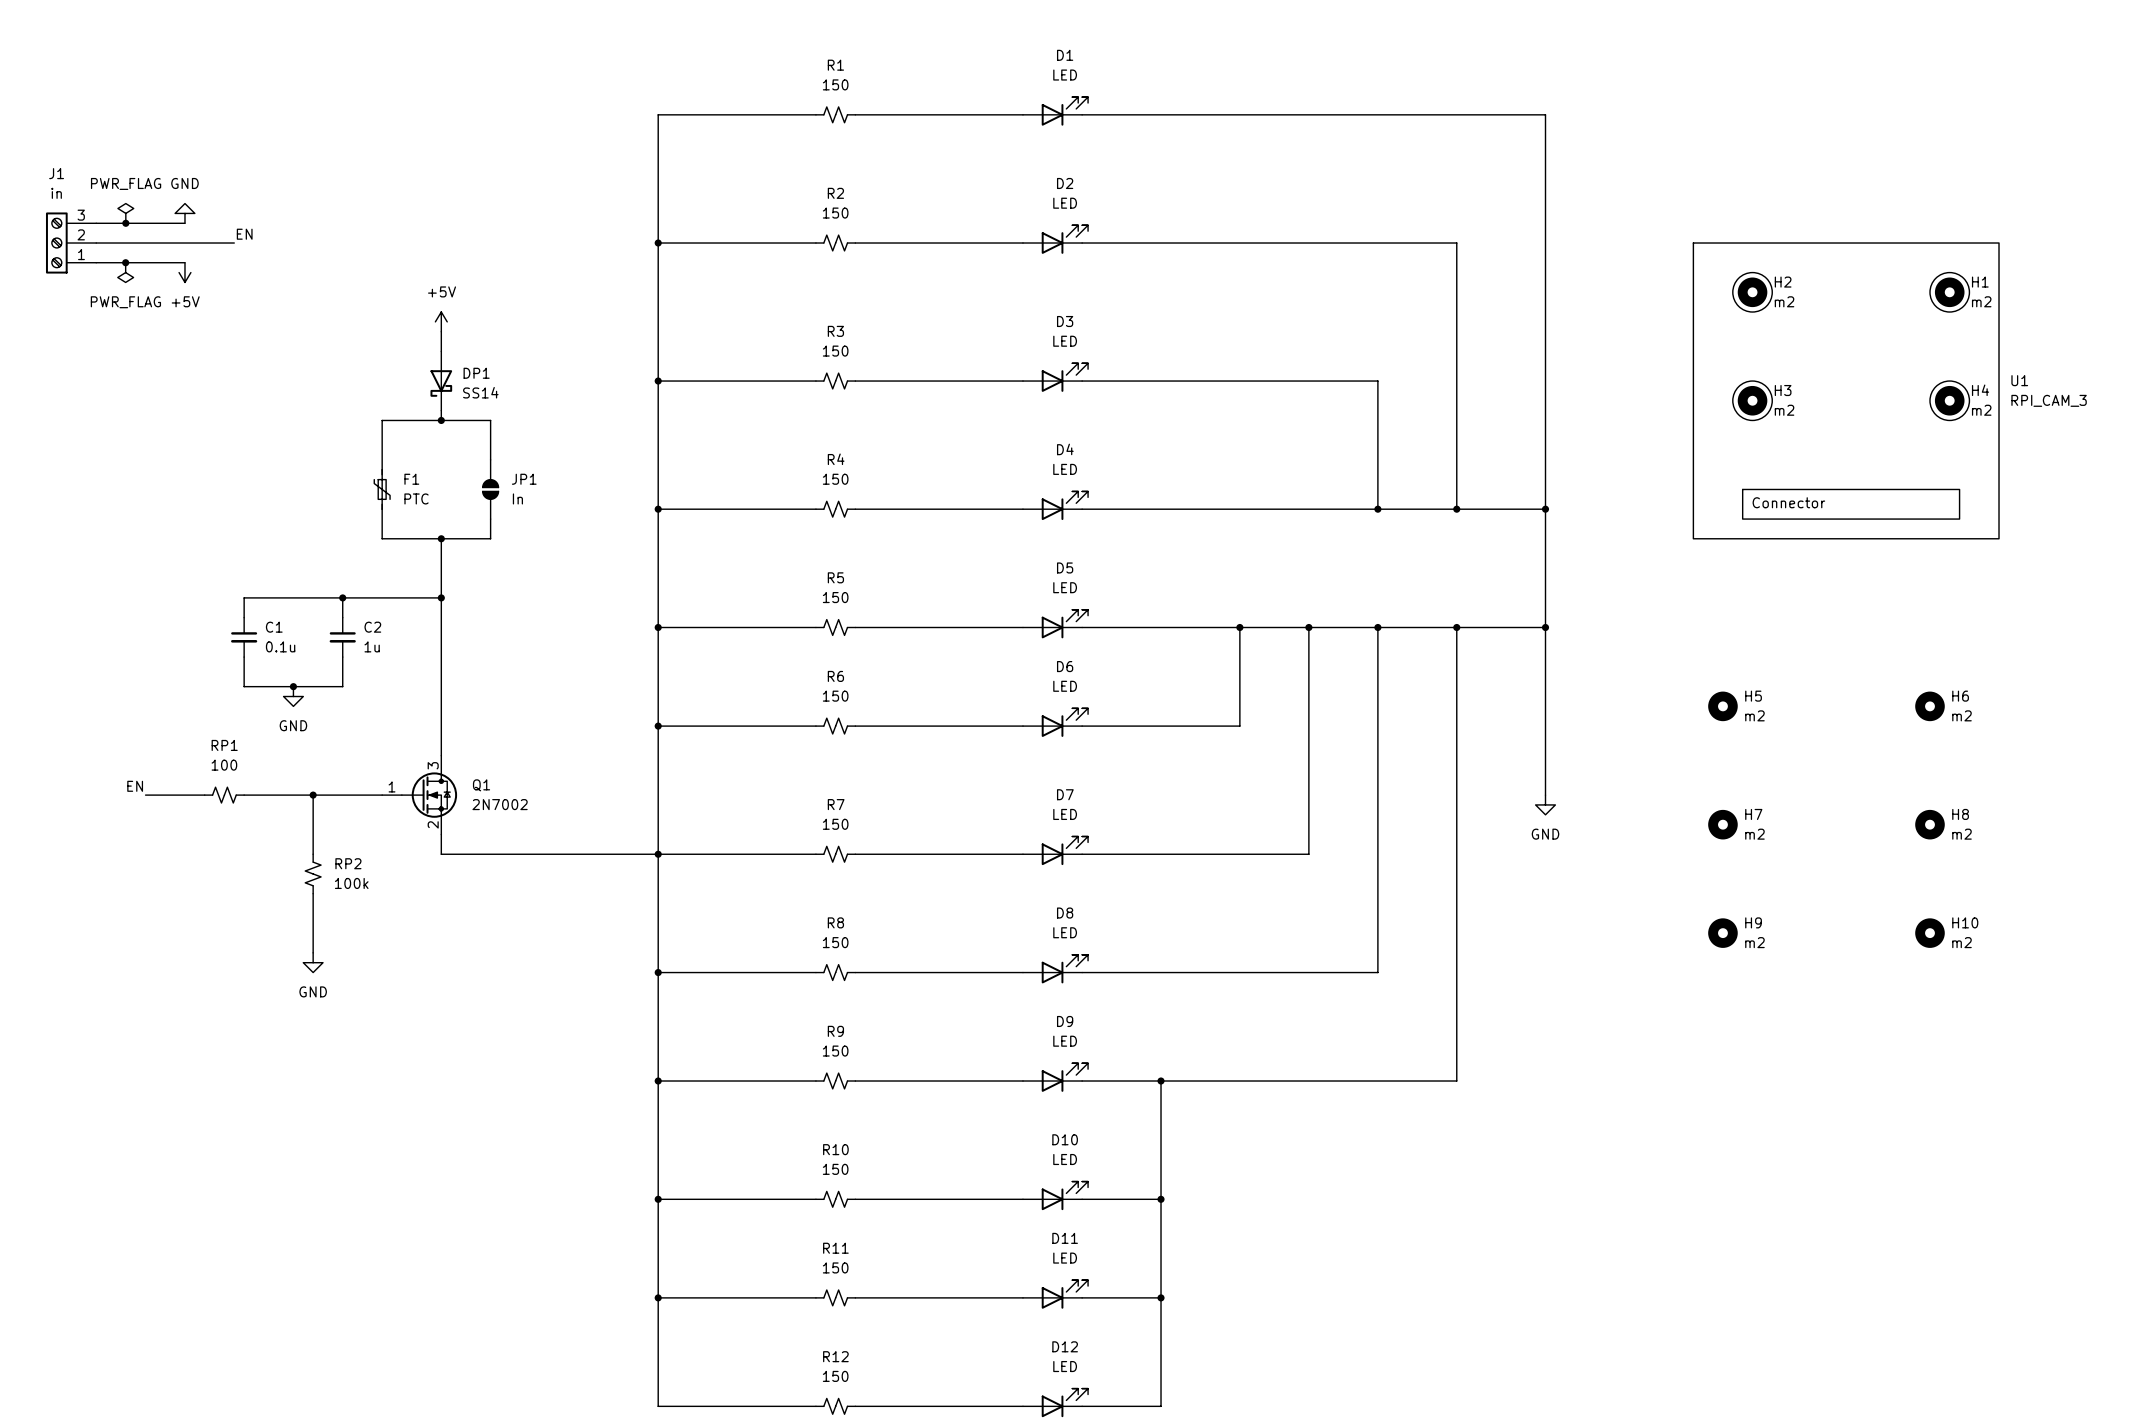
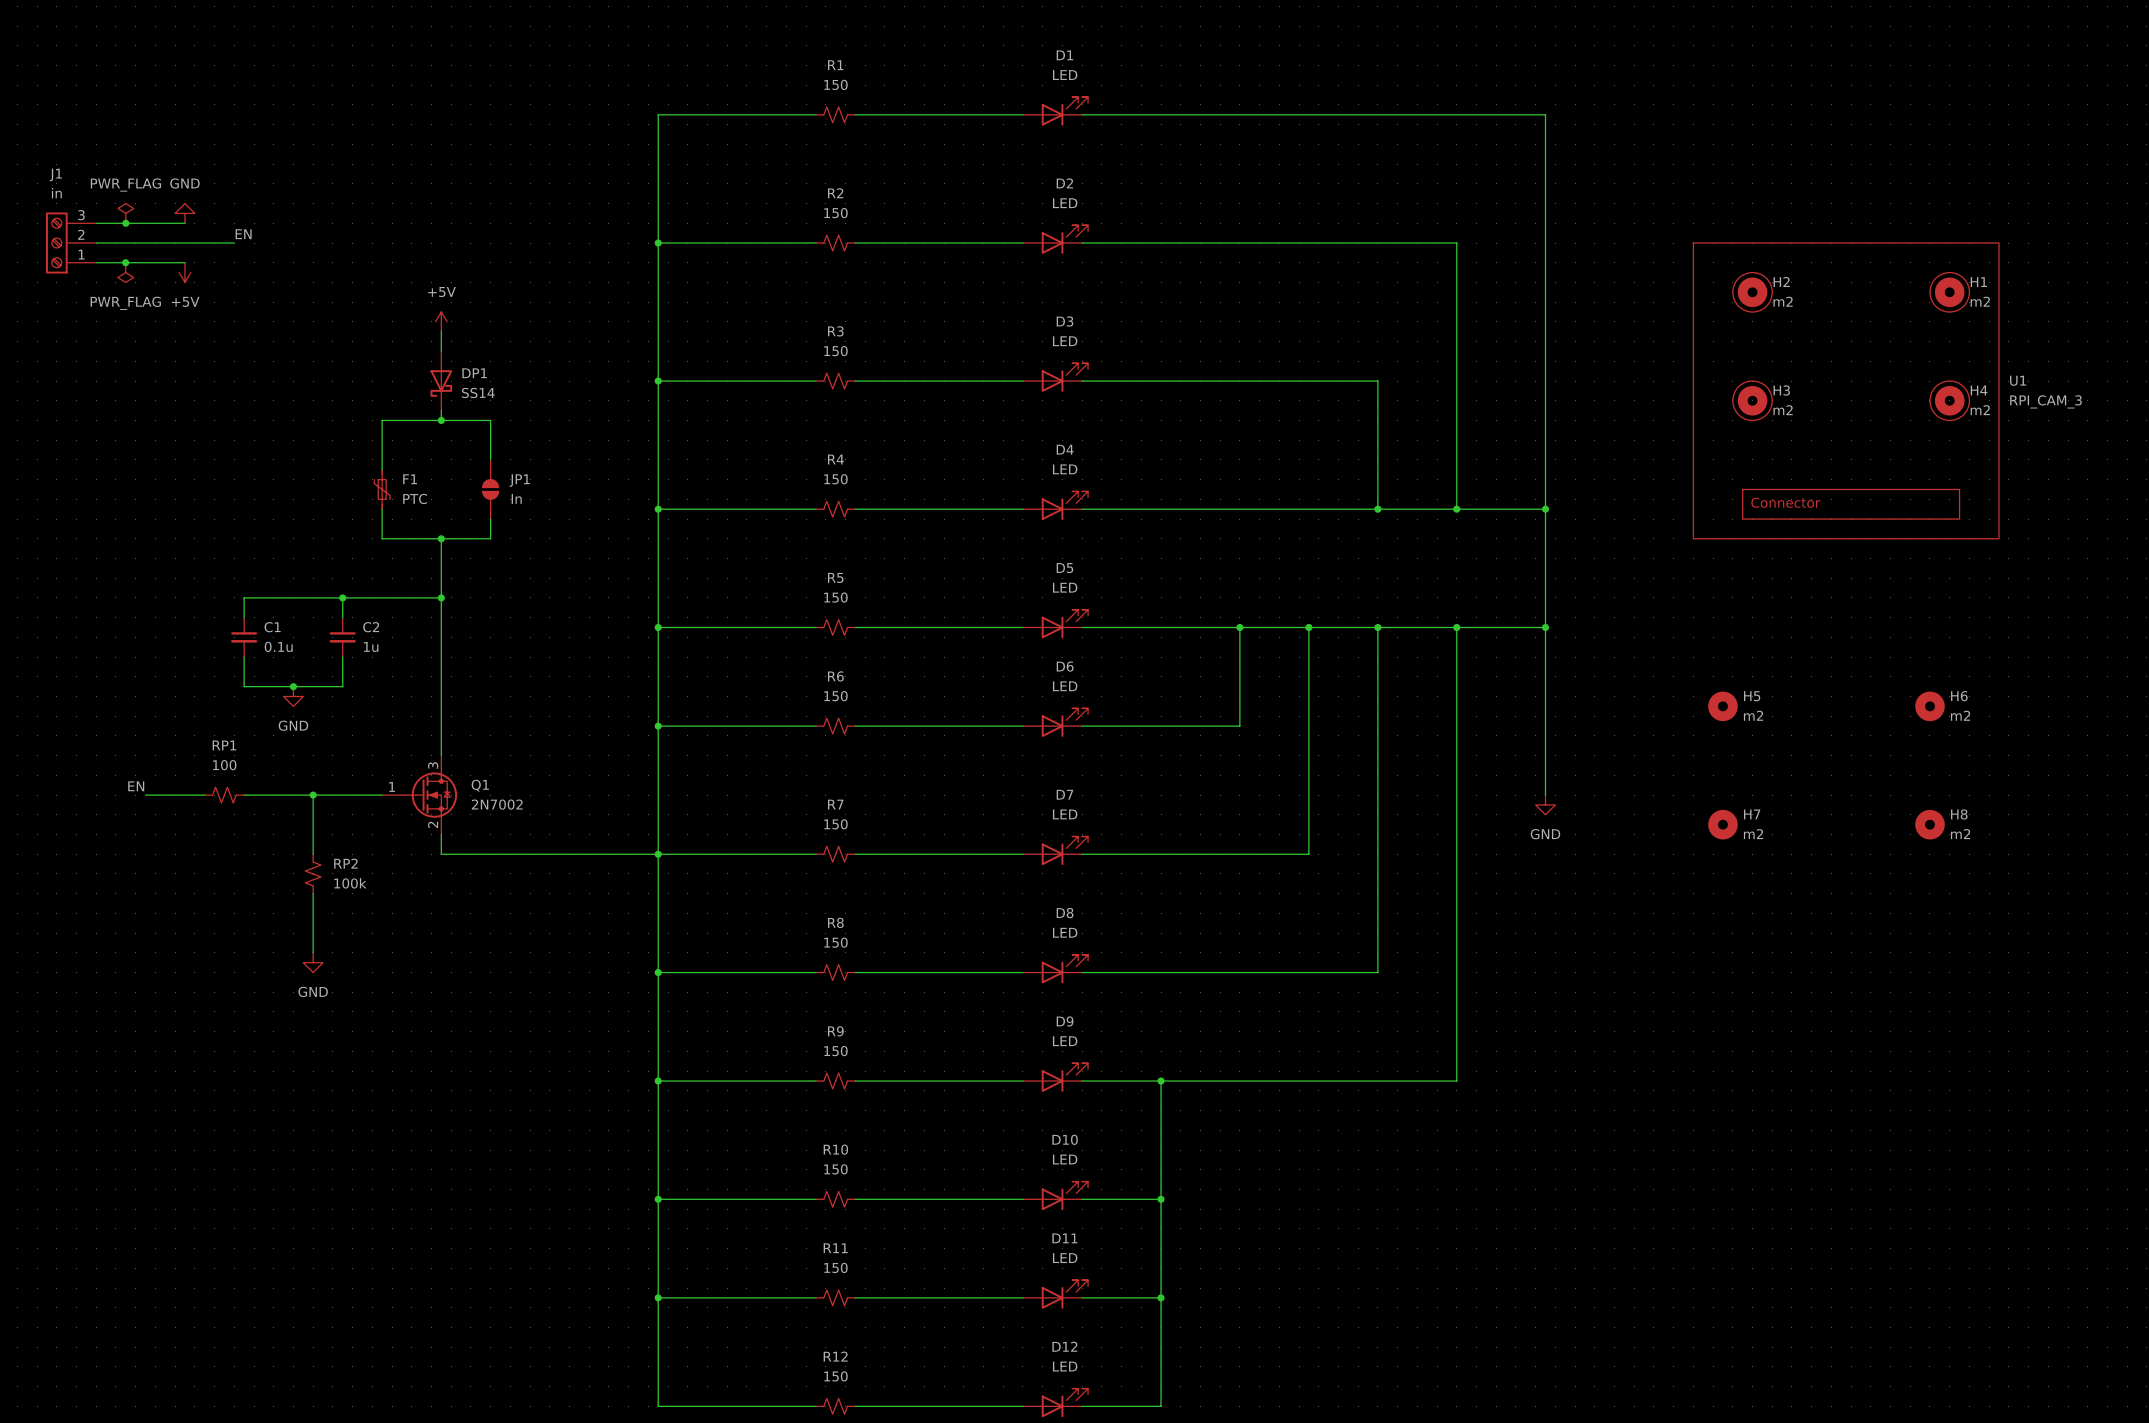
H9: m2 (1722, 933) -> none
H10: m2 (1929, 933) -> none

